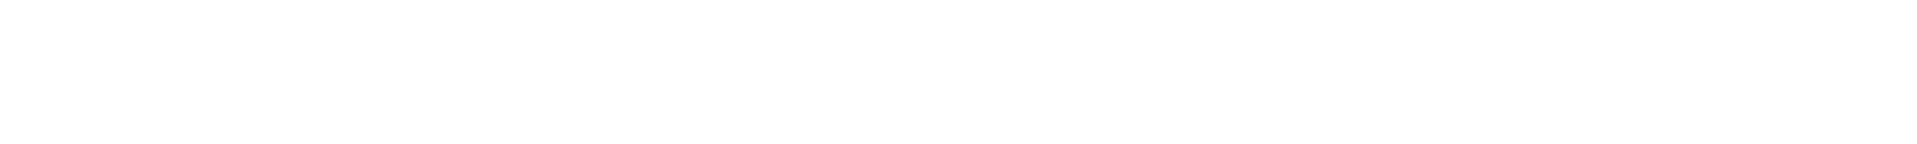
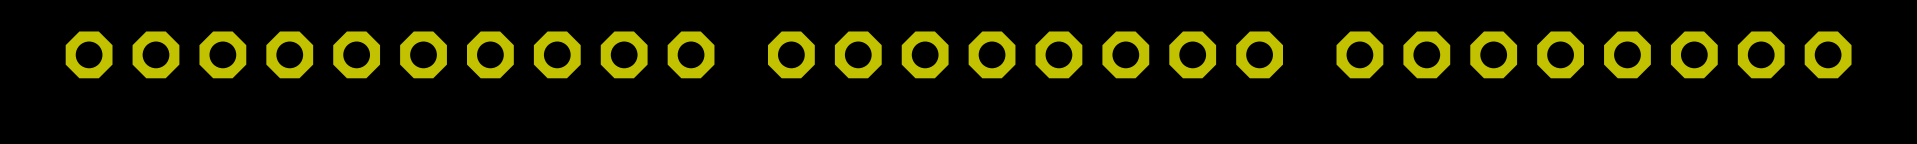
part: none -> (390, 54)
part: none -> (1025, 54)
part: none -> (1594, 54)

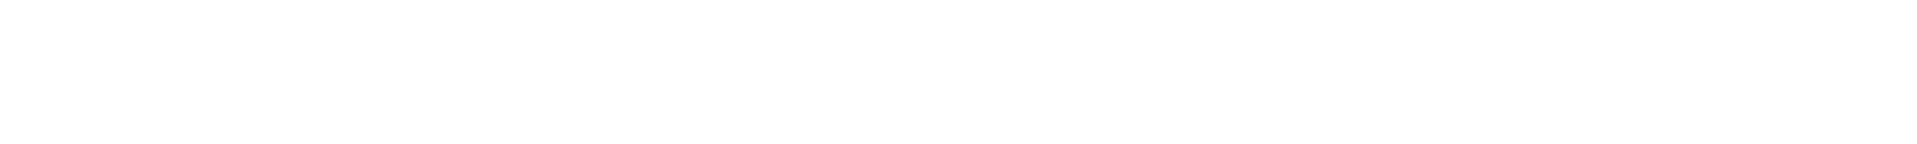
part: (390, 54) -> none
part: (1025, 54) -> none
part: (1594, 54) -> none

